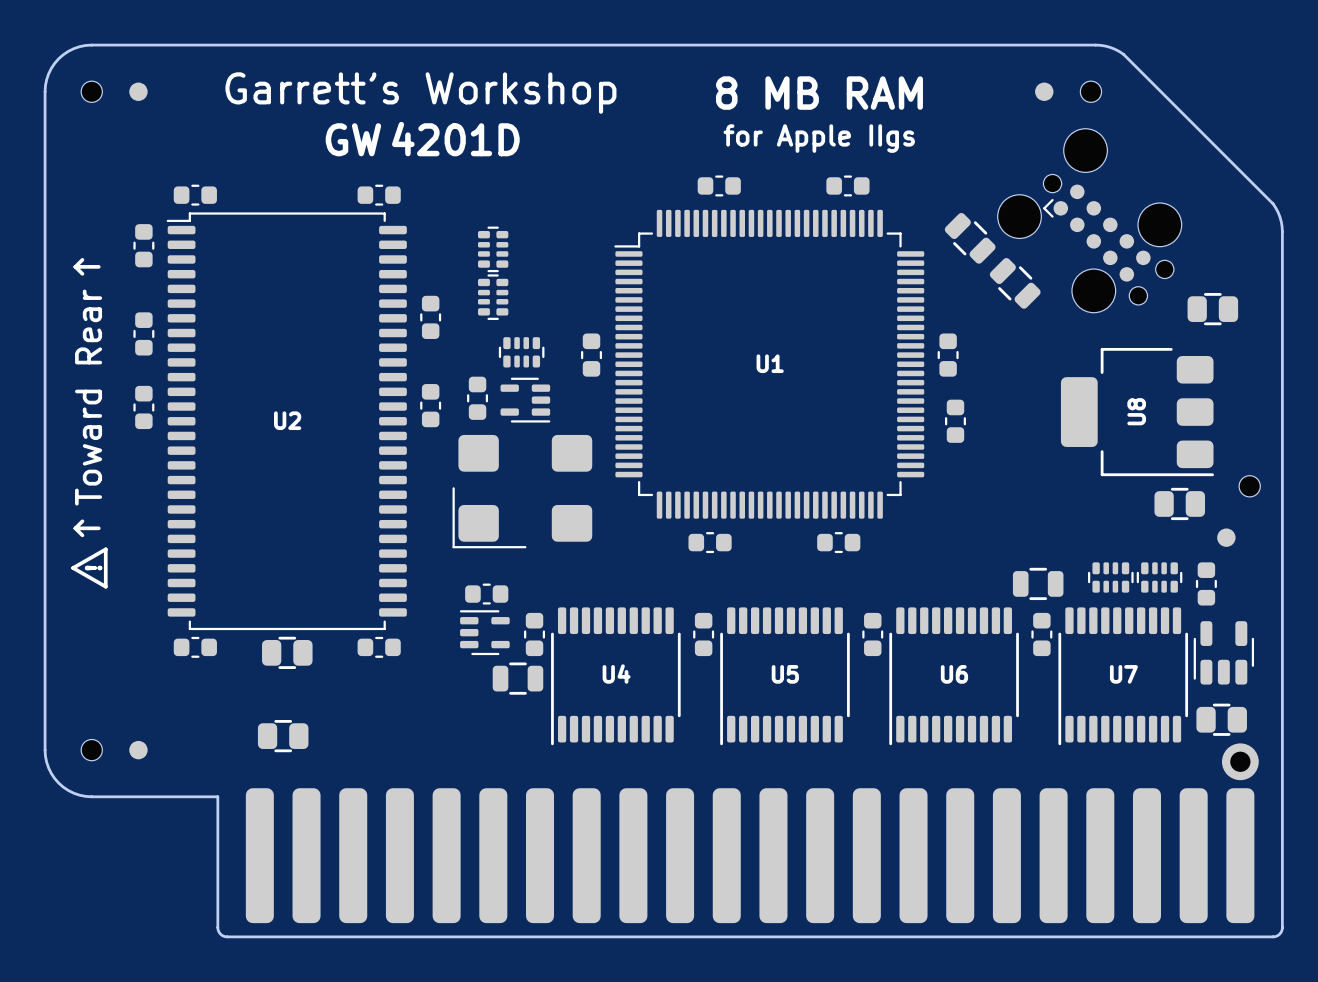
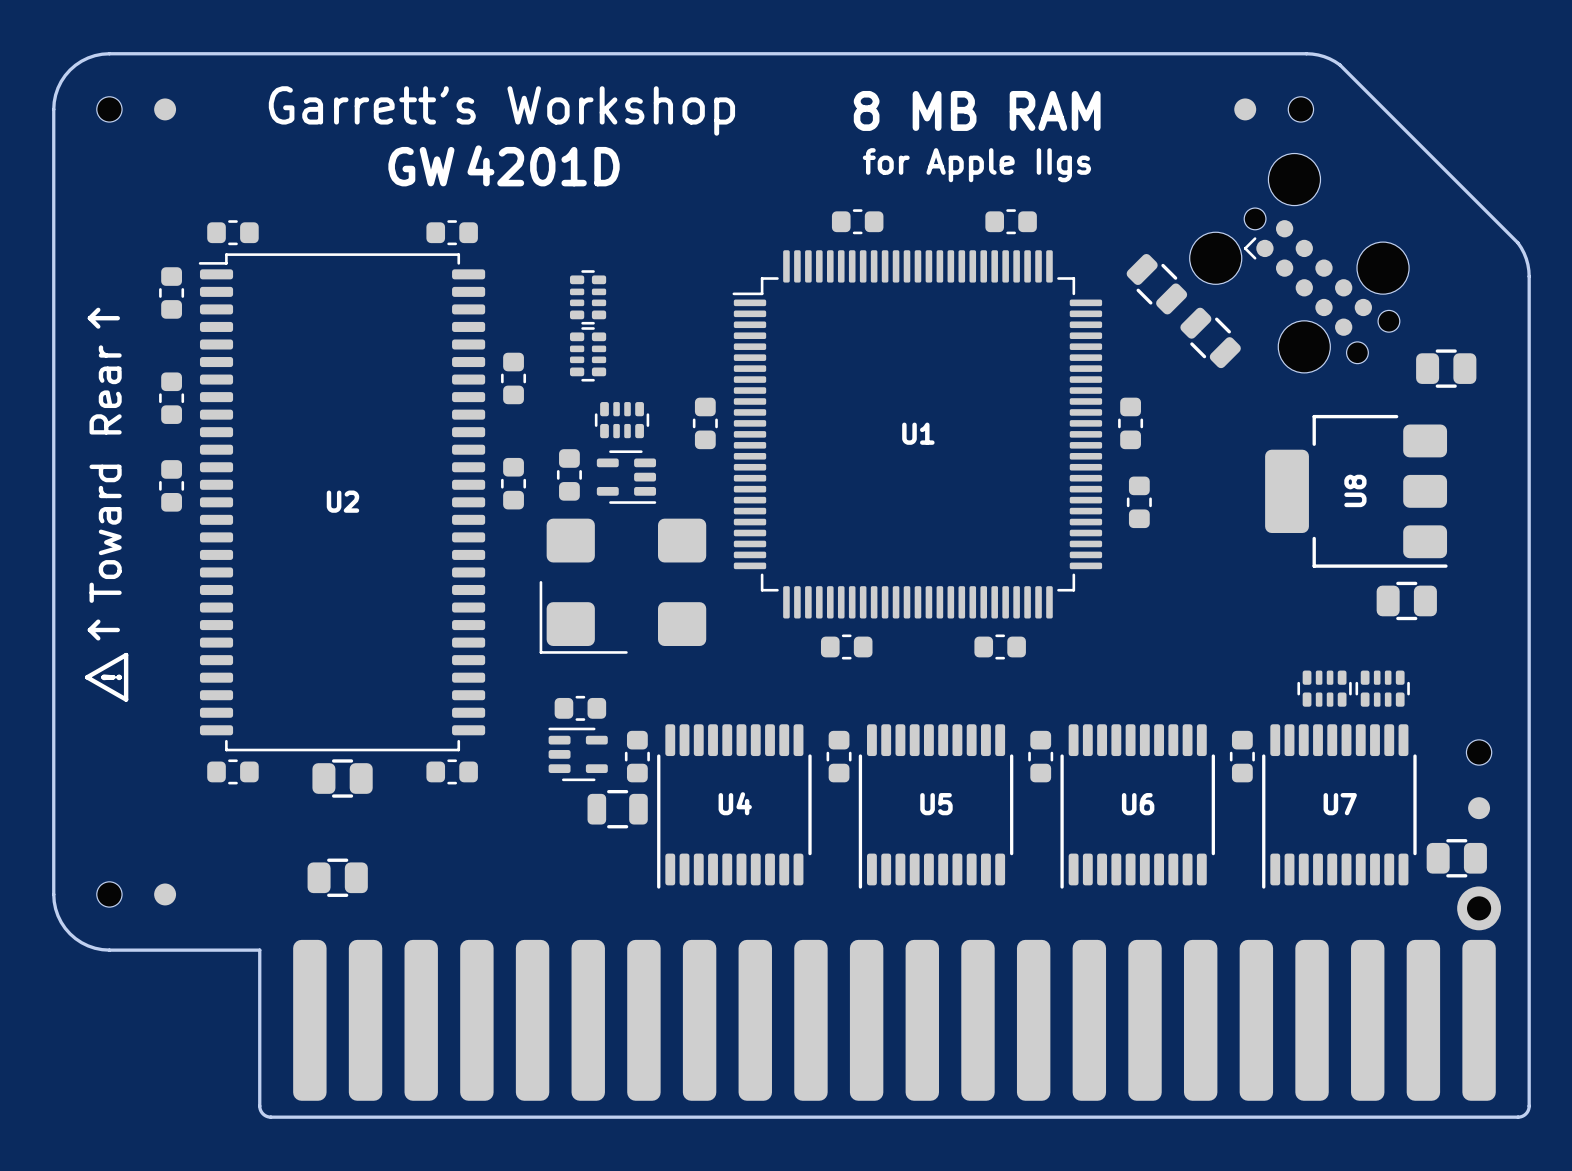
part position: (1249, 486) -> (1479, 752)
part position: (1226, 537) -> (1479, 808)
part: (1038, 583) -> none
part: (1206, 583) -> none
part: (1223, 652) -> none

